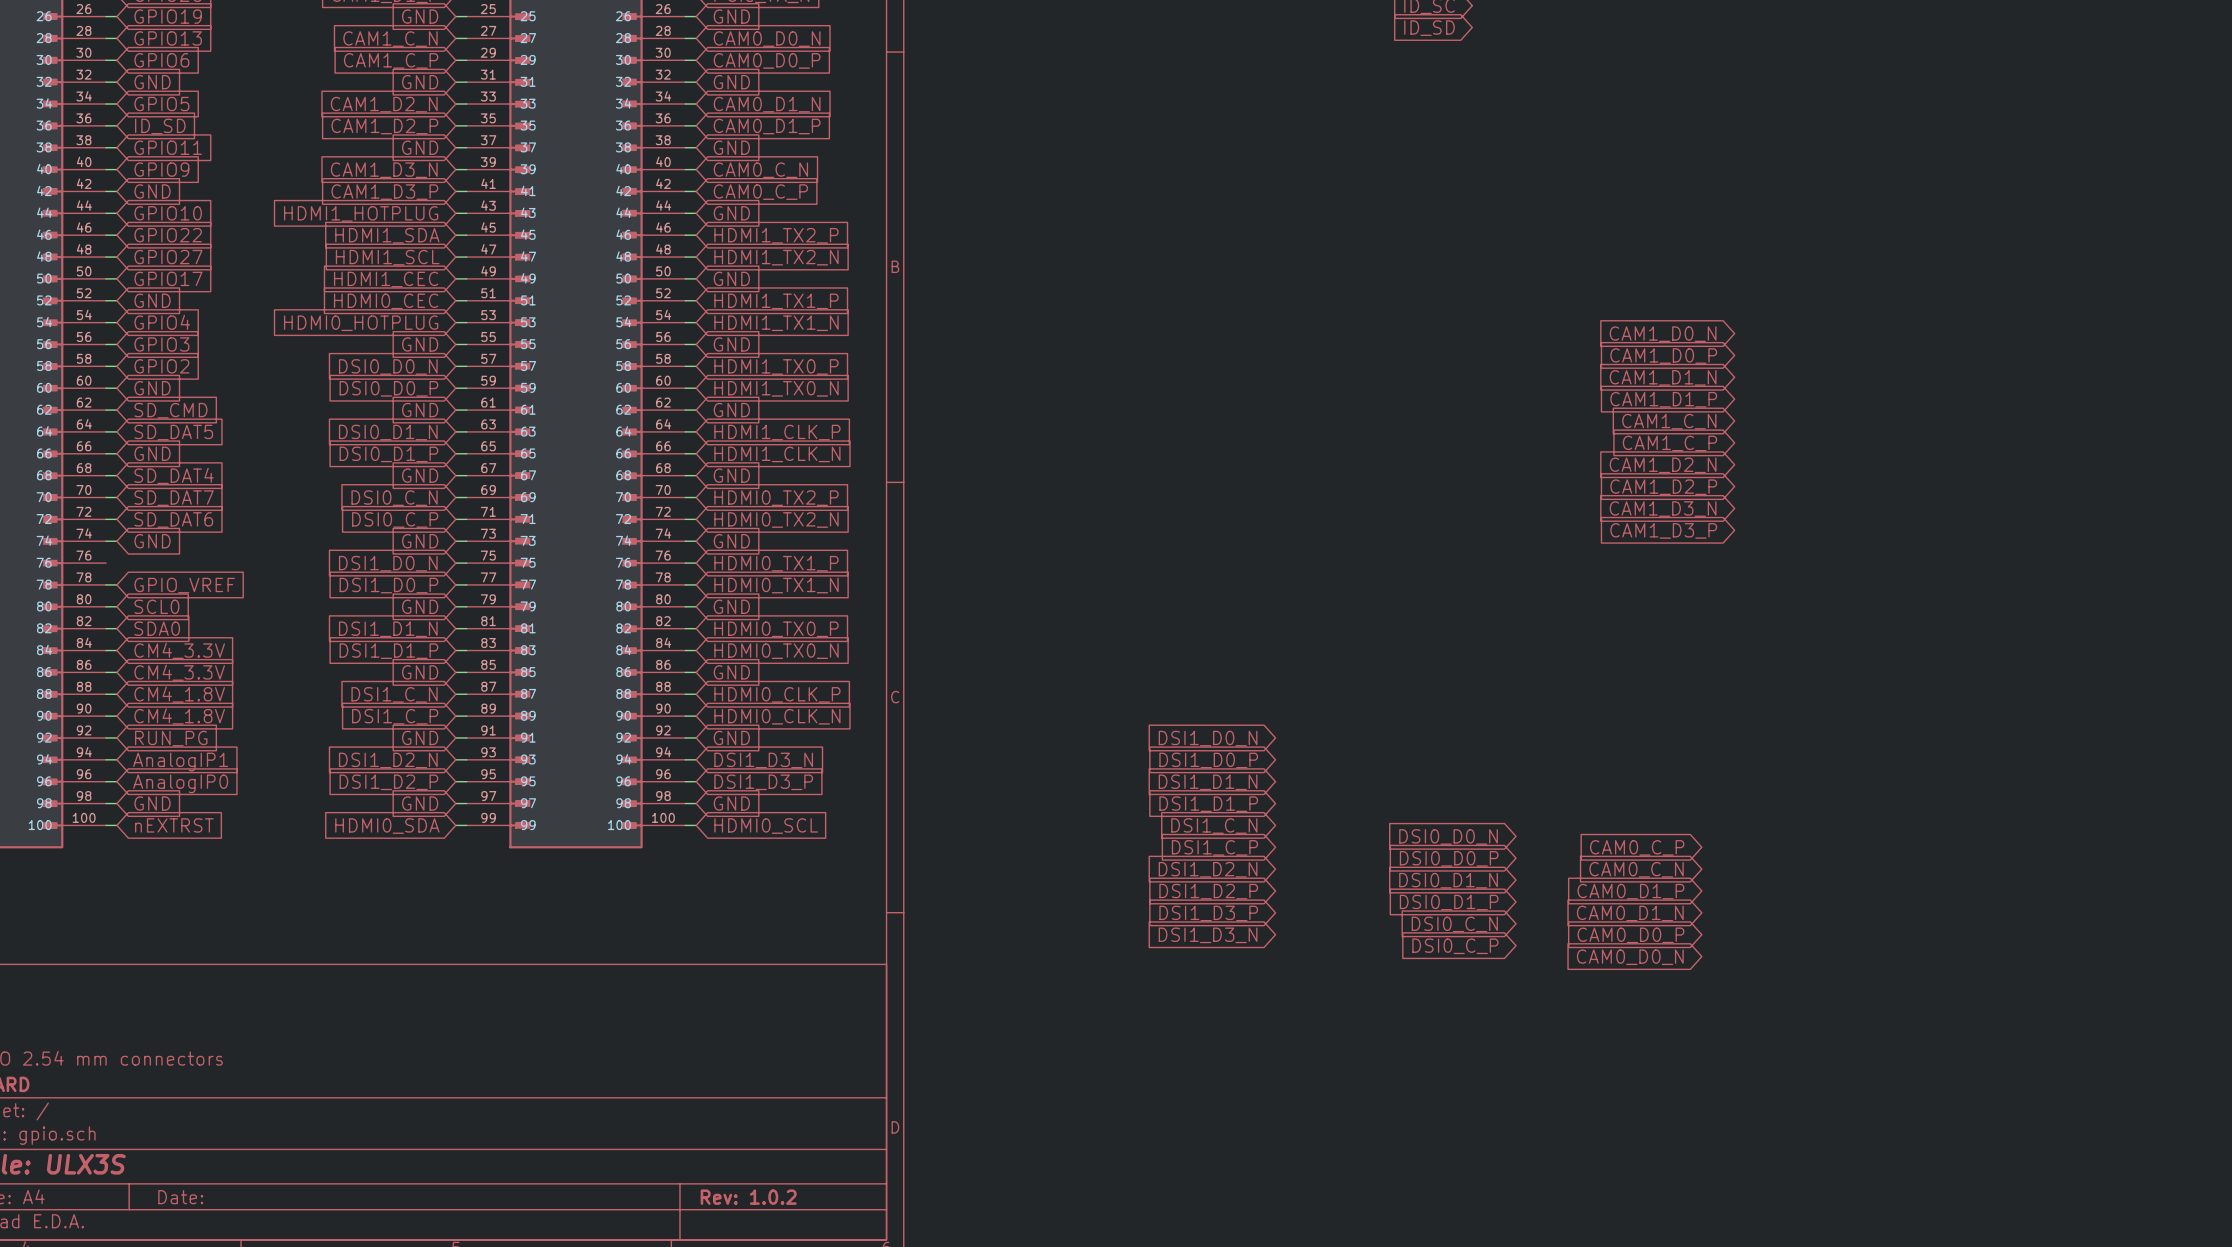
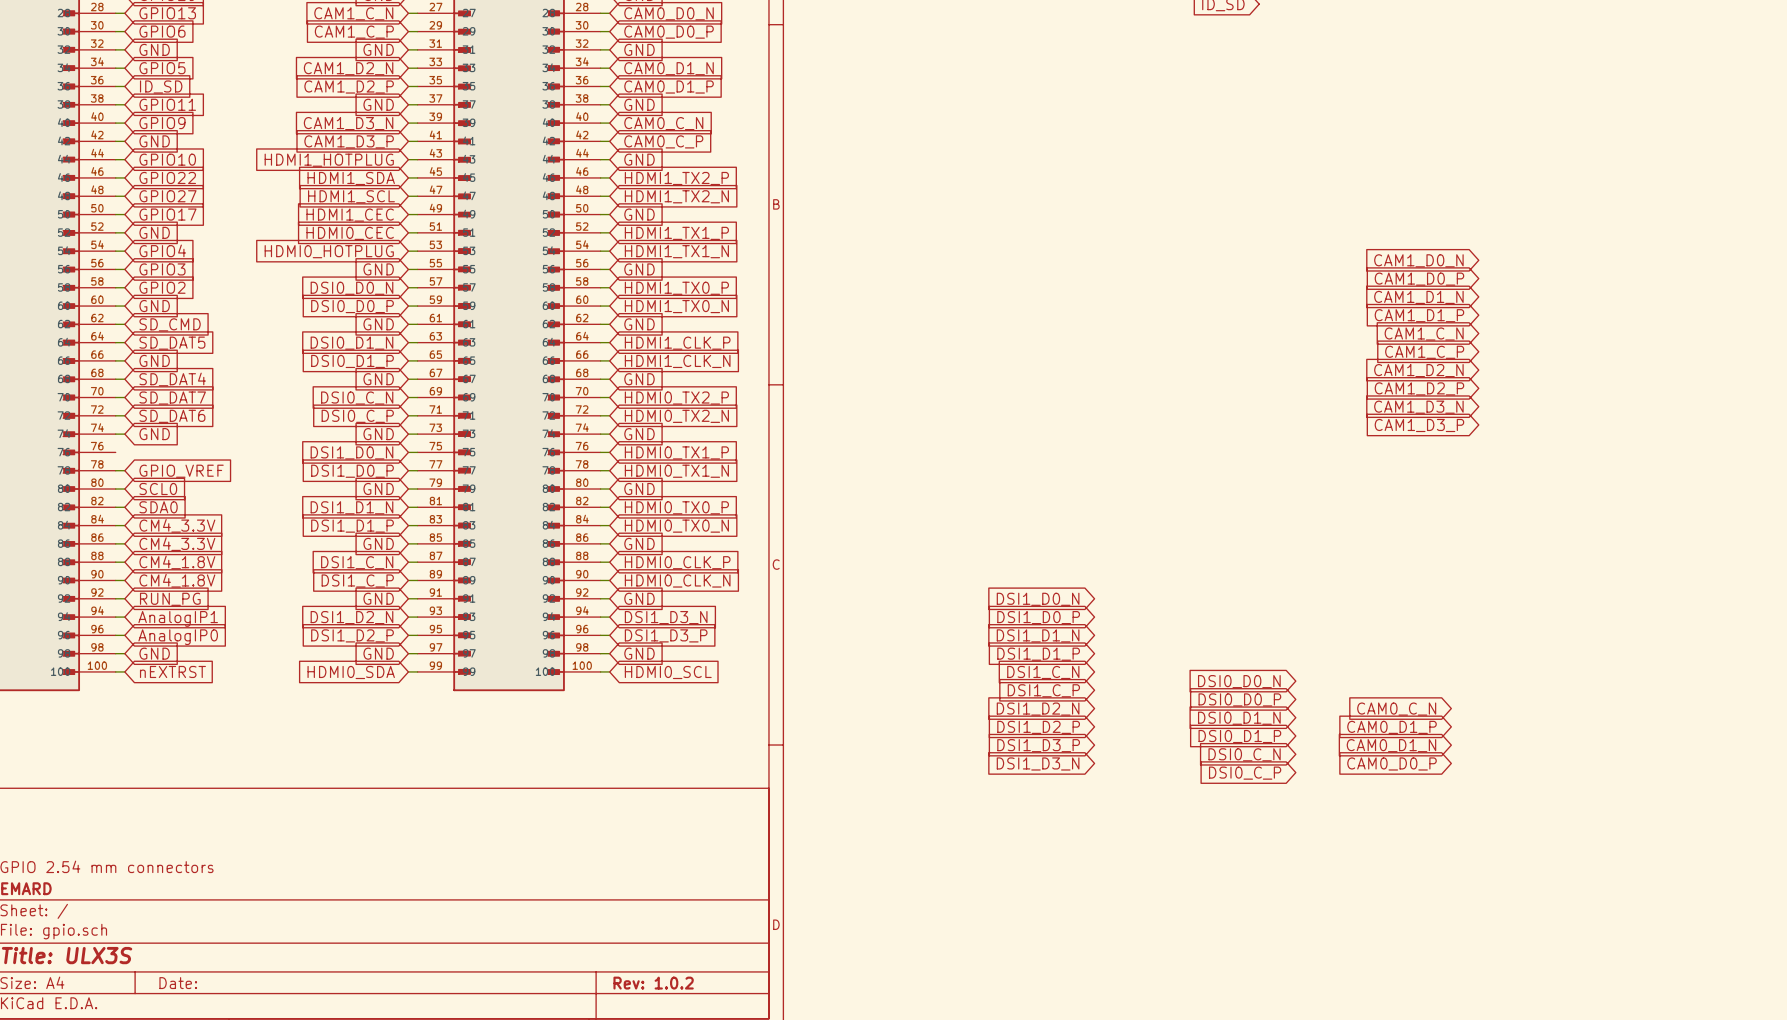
global label: CAM0_C_P (1637, 847) -> none
global label: CAM0_D0_N (1630, 957) -> none

